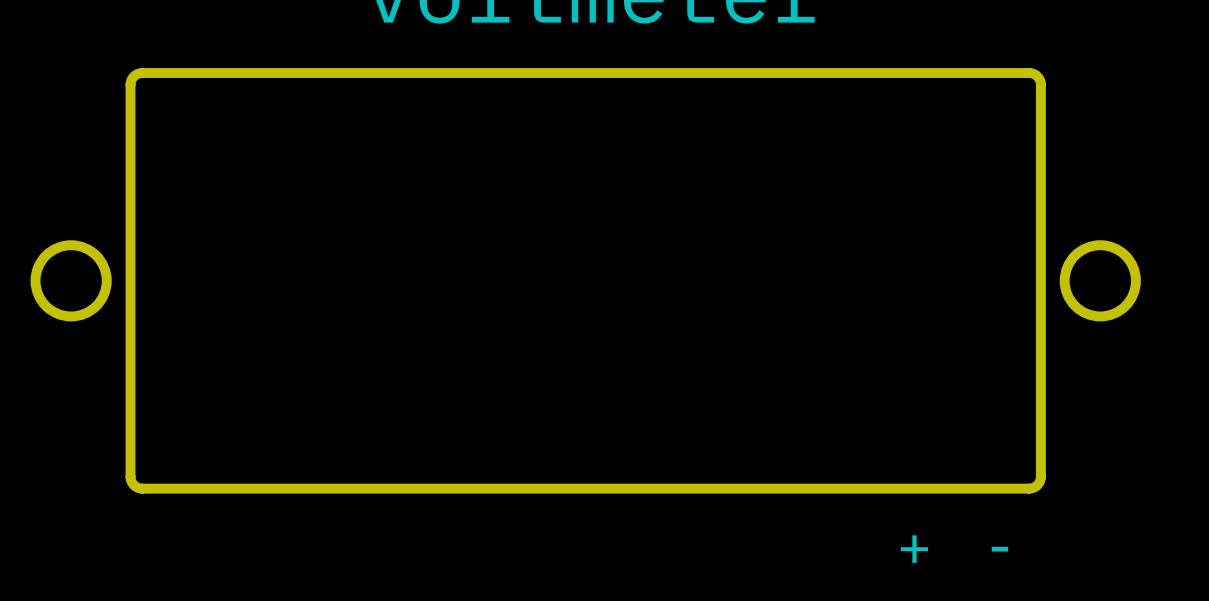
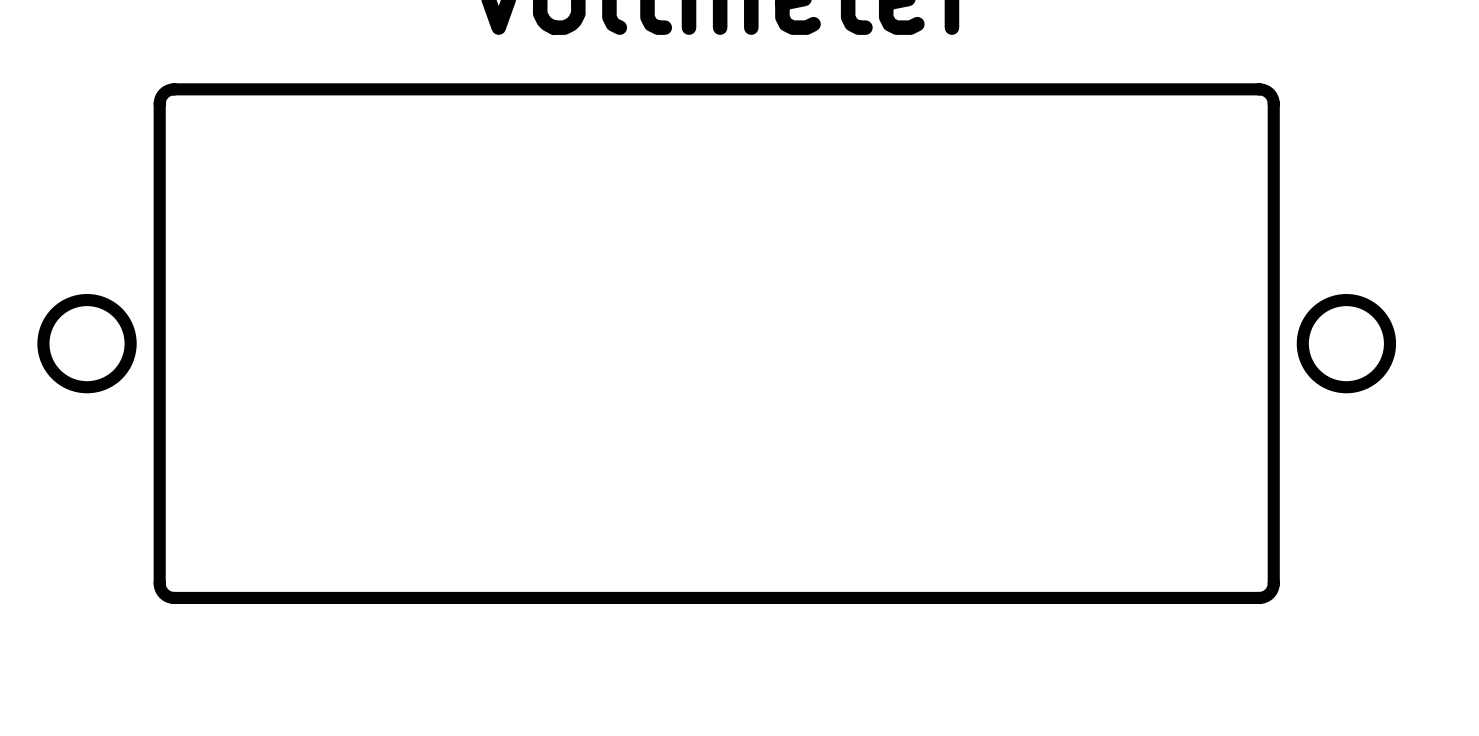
text: + (914, 549) -> none
text: - (999, 549) -> none

